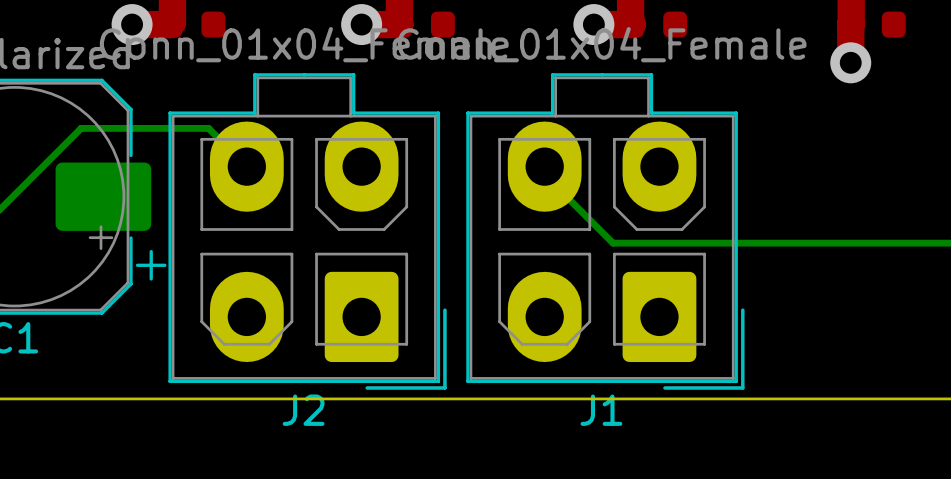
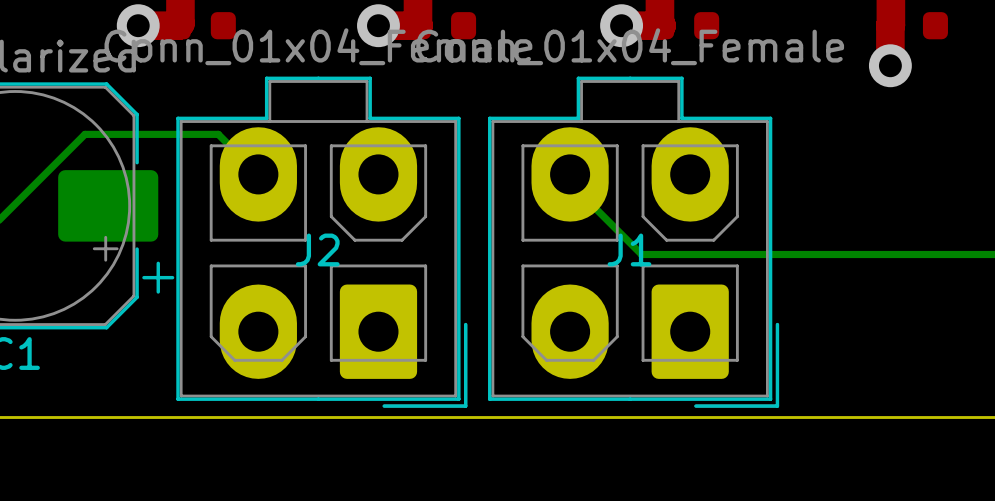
J2 name position: J2 (303, 410) -> J2 (317, 249)
J1 name position: J1 (601, 410) -> J1 (629, 249)

